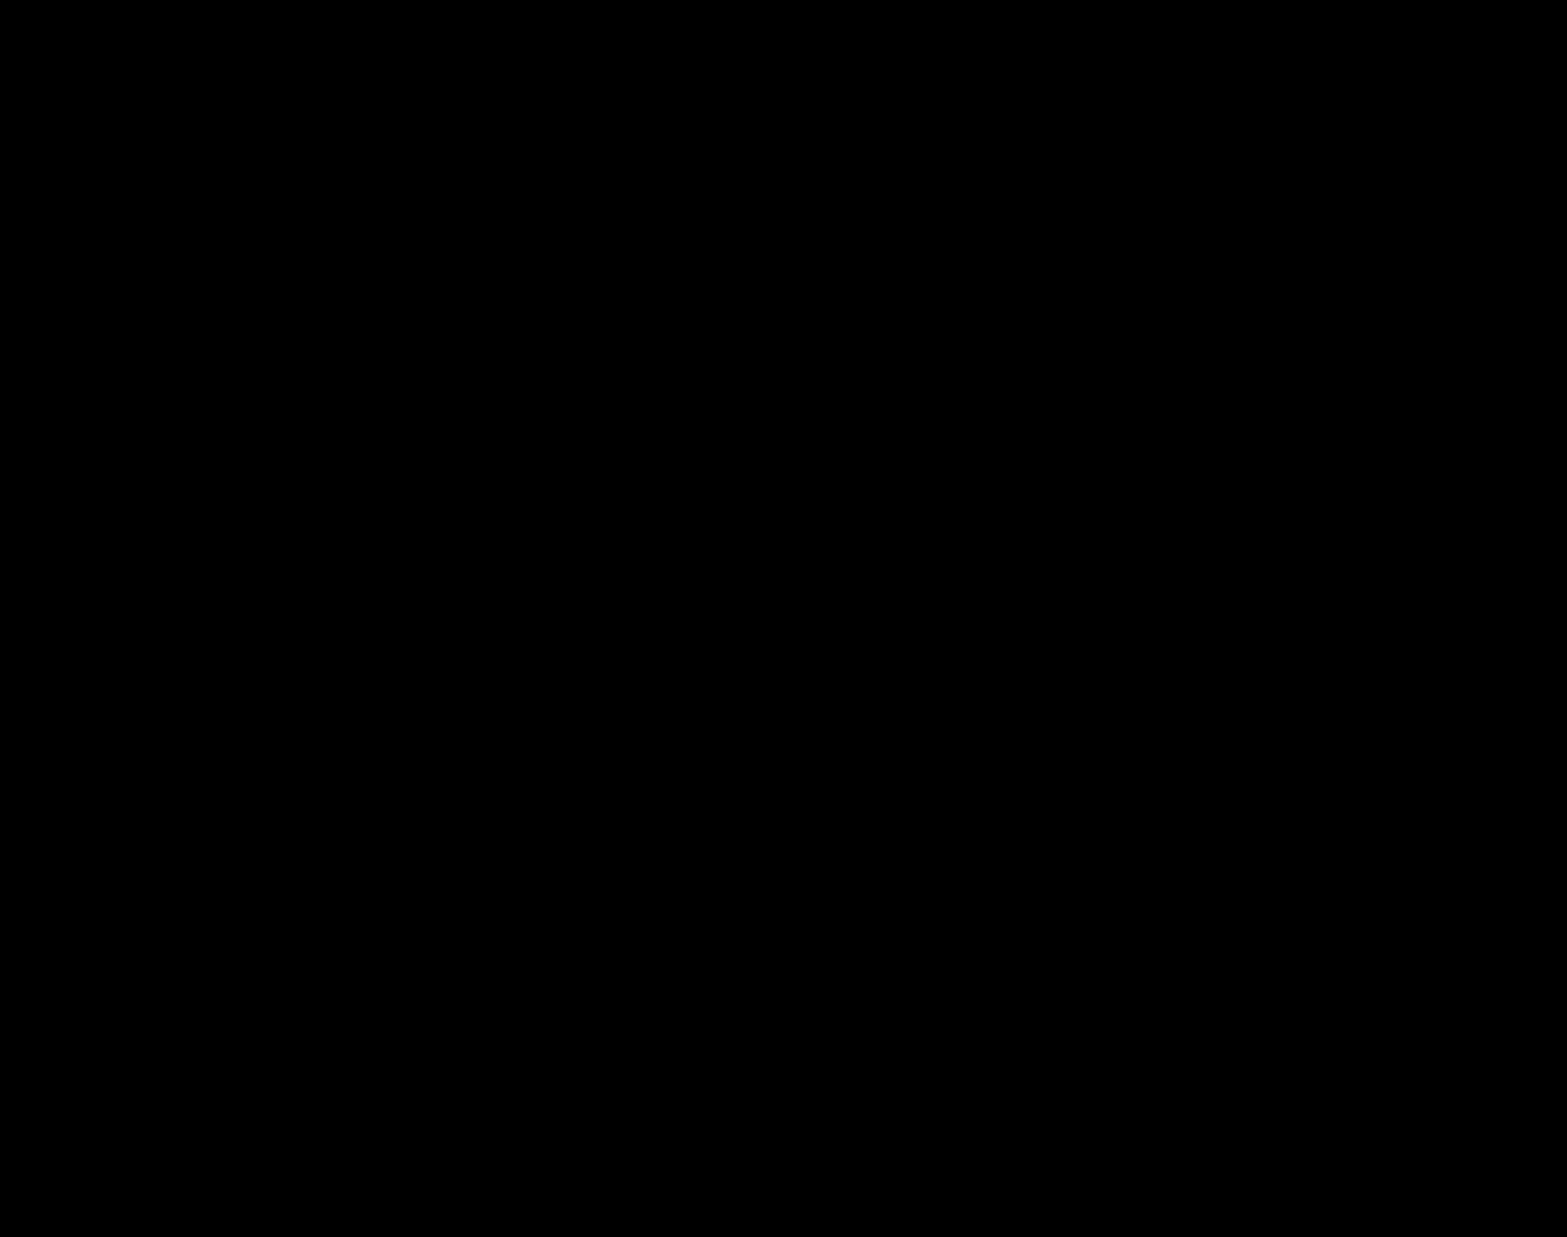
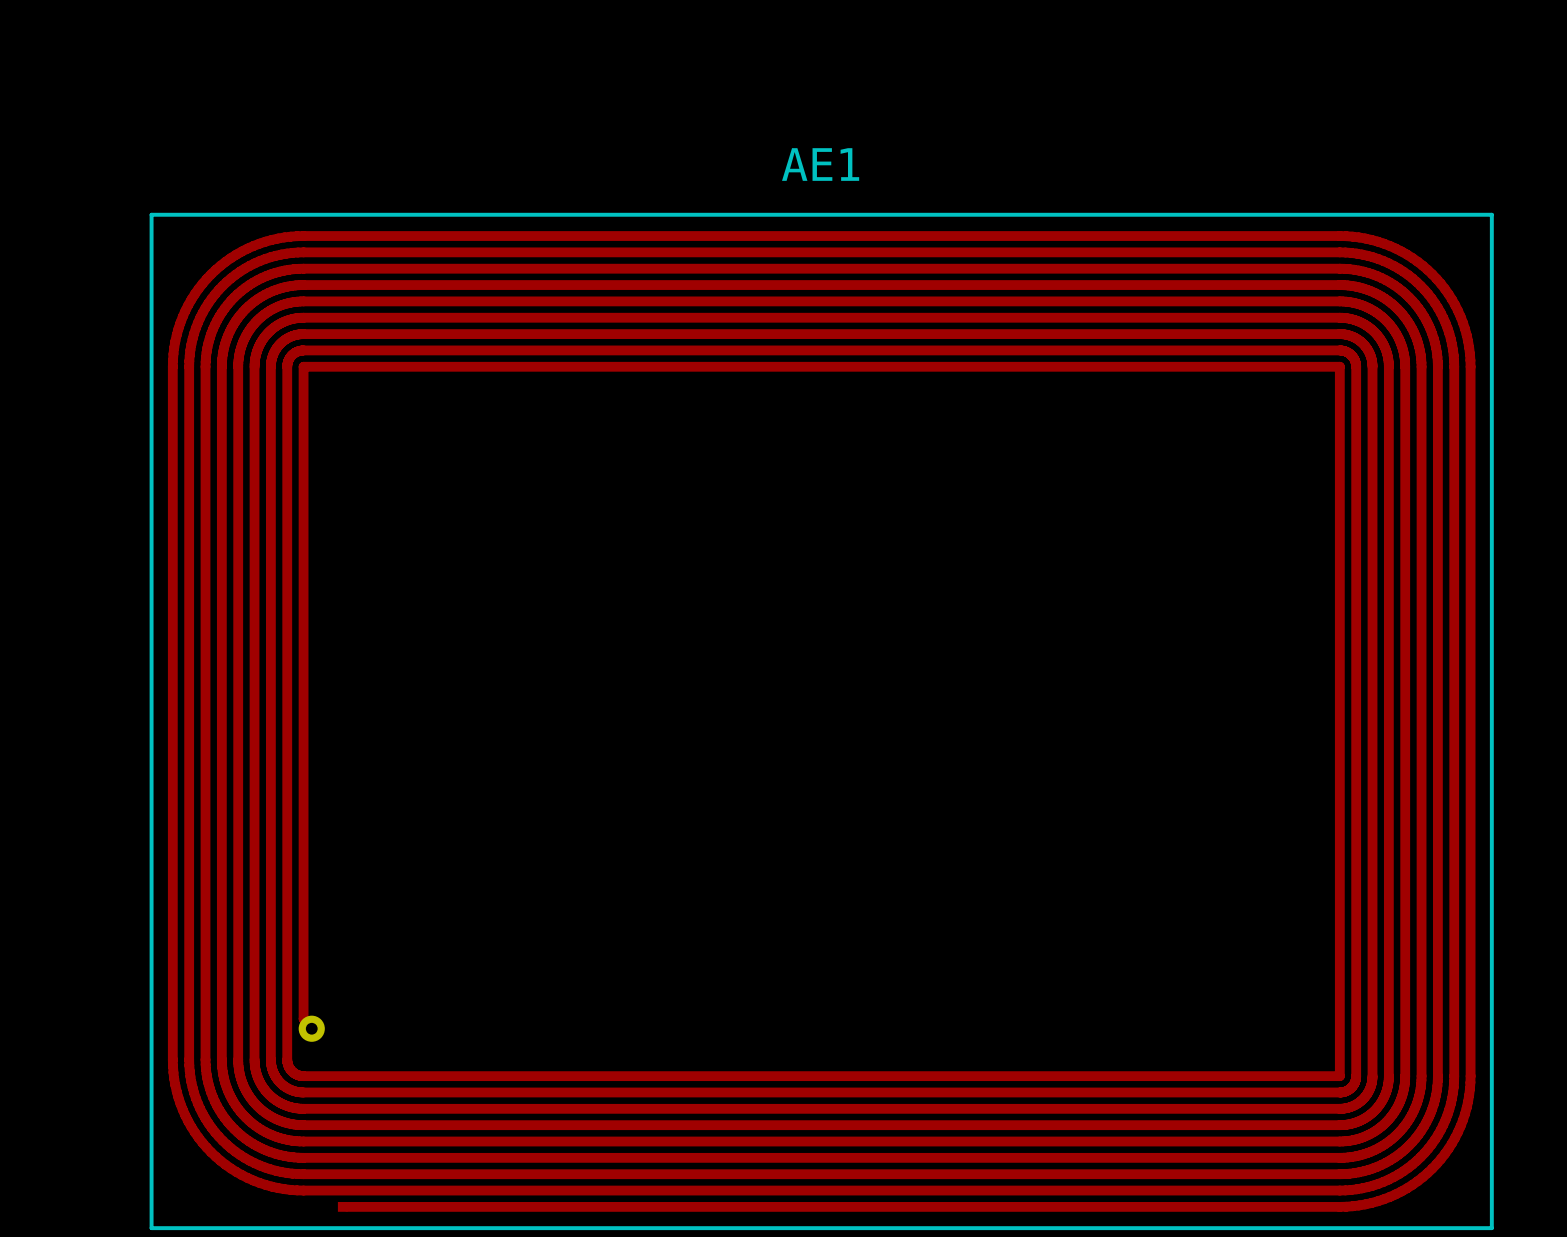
AE1: none -> (821, 721)

